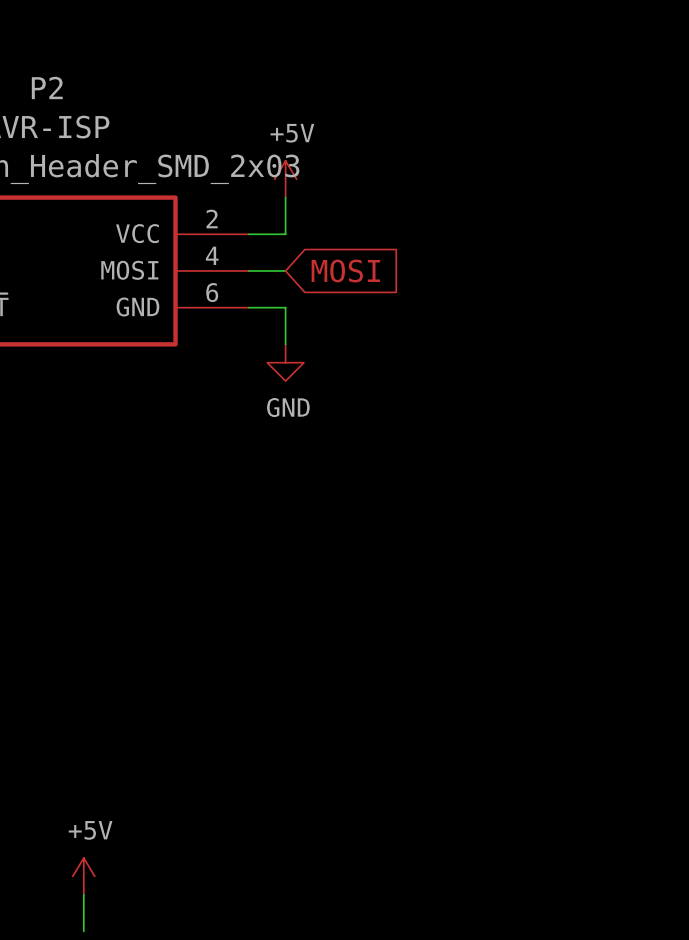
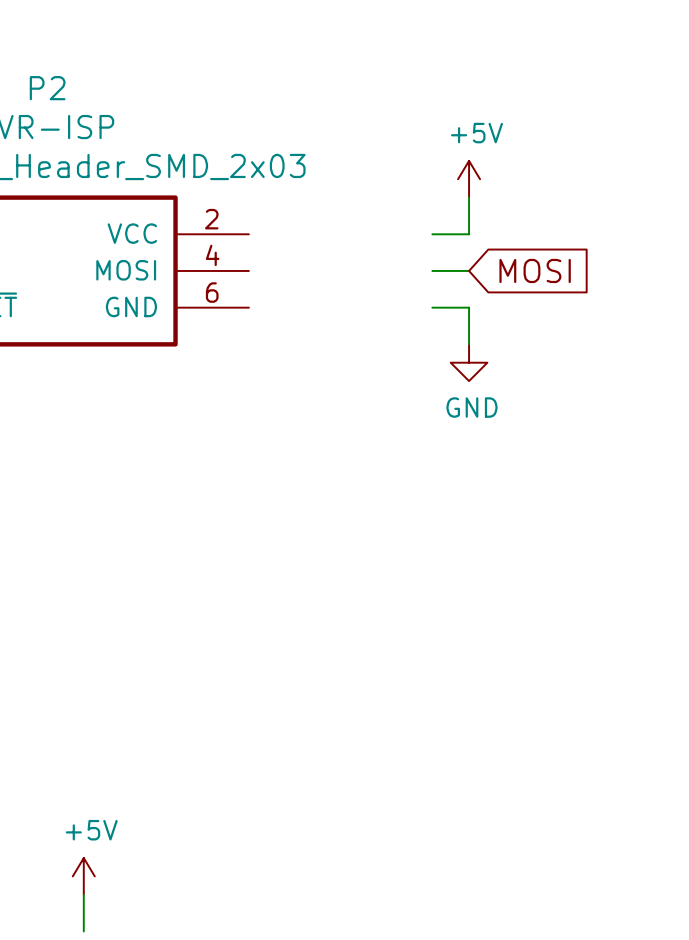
power symbol position: +5V (285, 179) -> +5V (469, 179)
wire: (285, 197) (285, 234) (248, 234) -> (469, 197) (469, 234) (432, 234)
wire: (248, 270) (285, 270) -> (432, 270) (469, 270)
global label position: MOSI (345, 270) -> MOSI (535, 270)
wire: (248, 307) (285, 307) (285, 344) -> (432, 307) (469, 307) (469, 344)
power symbol position: GND (285, 362) -> GND (469, 362)

